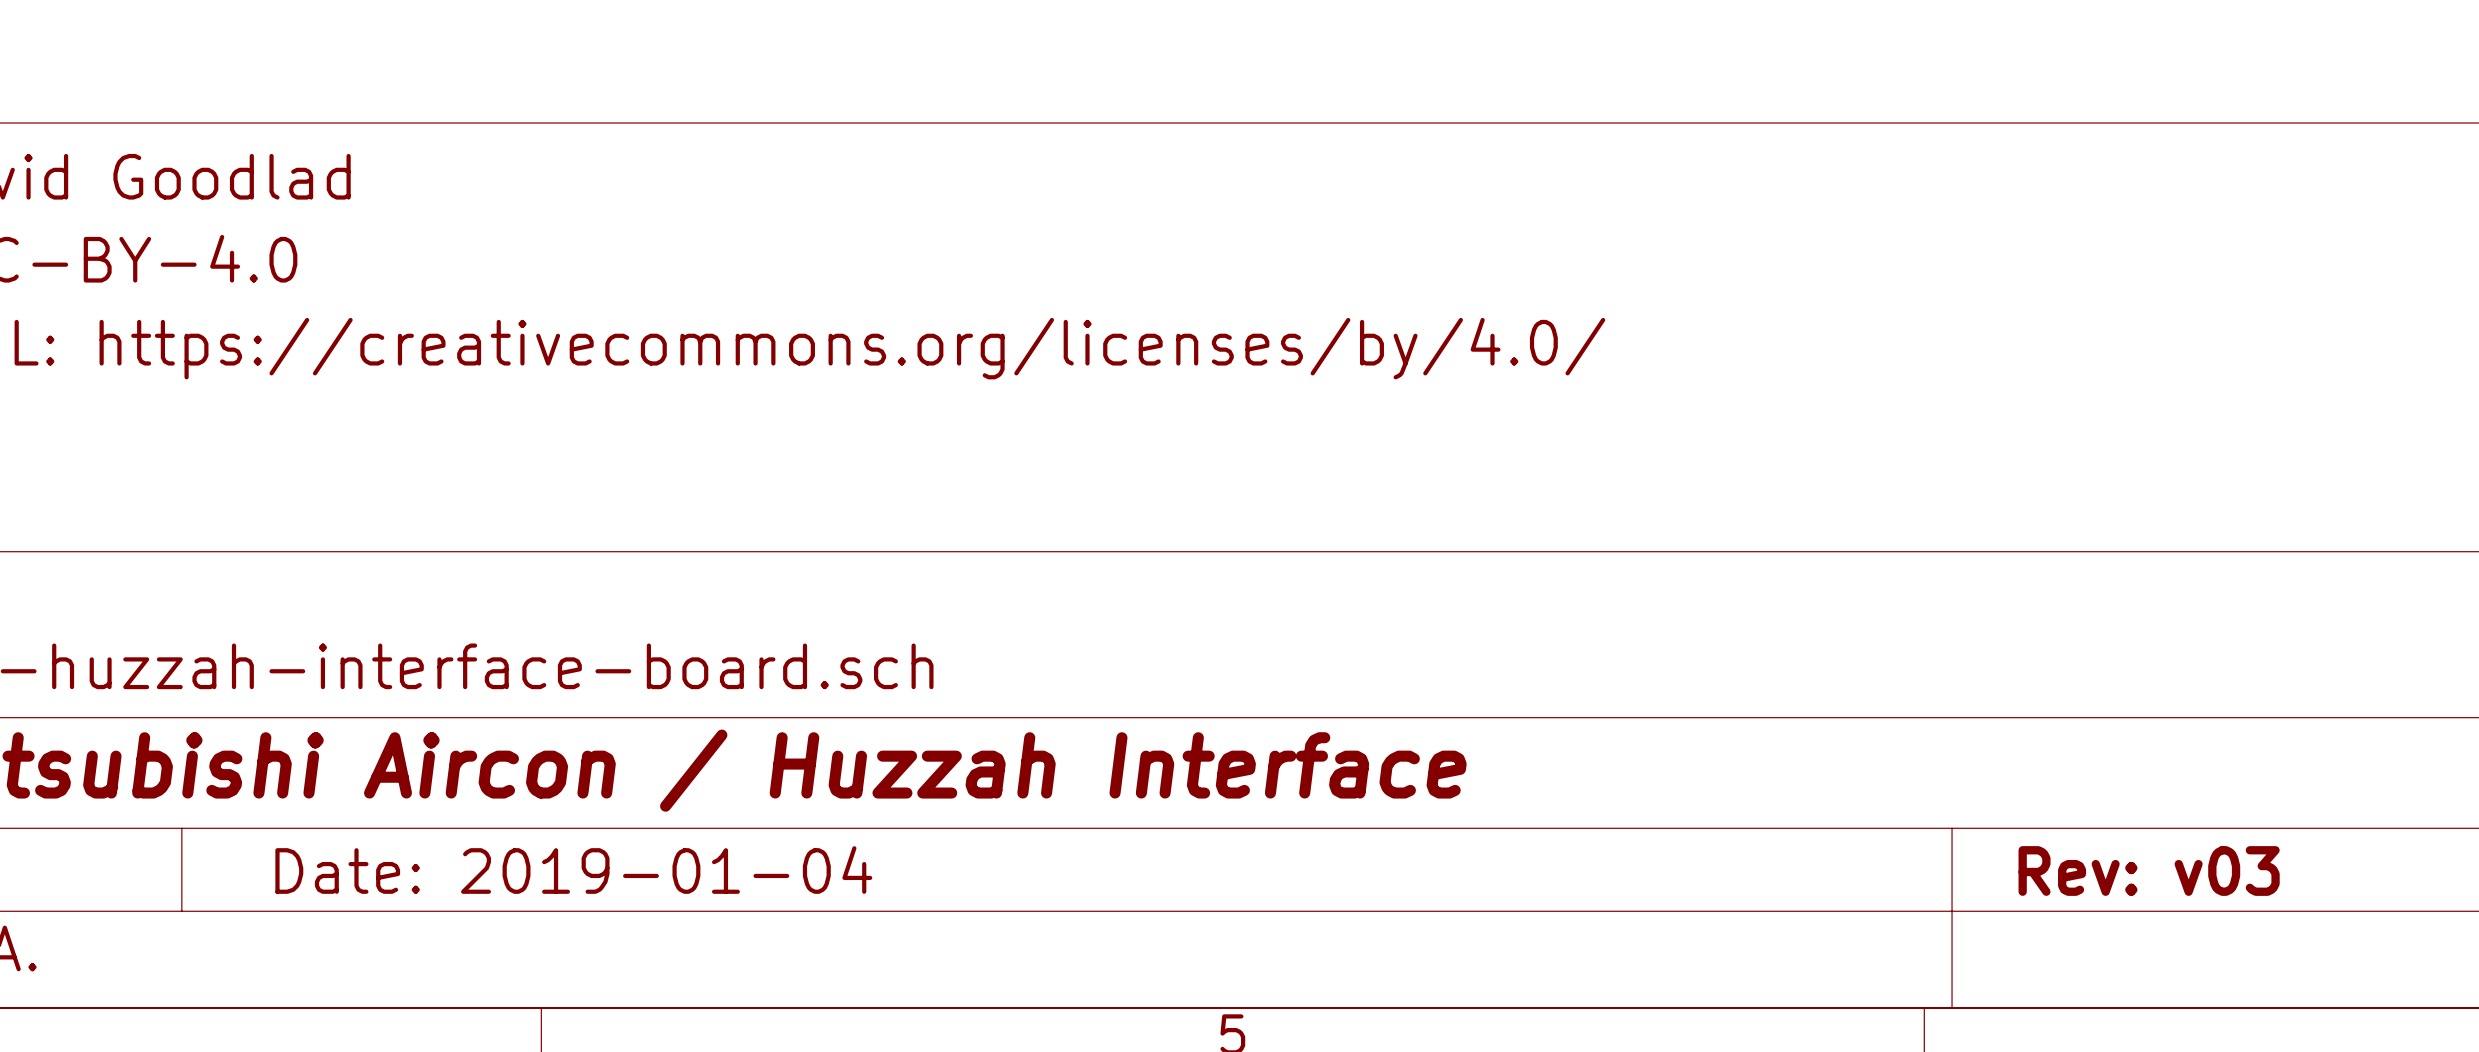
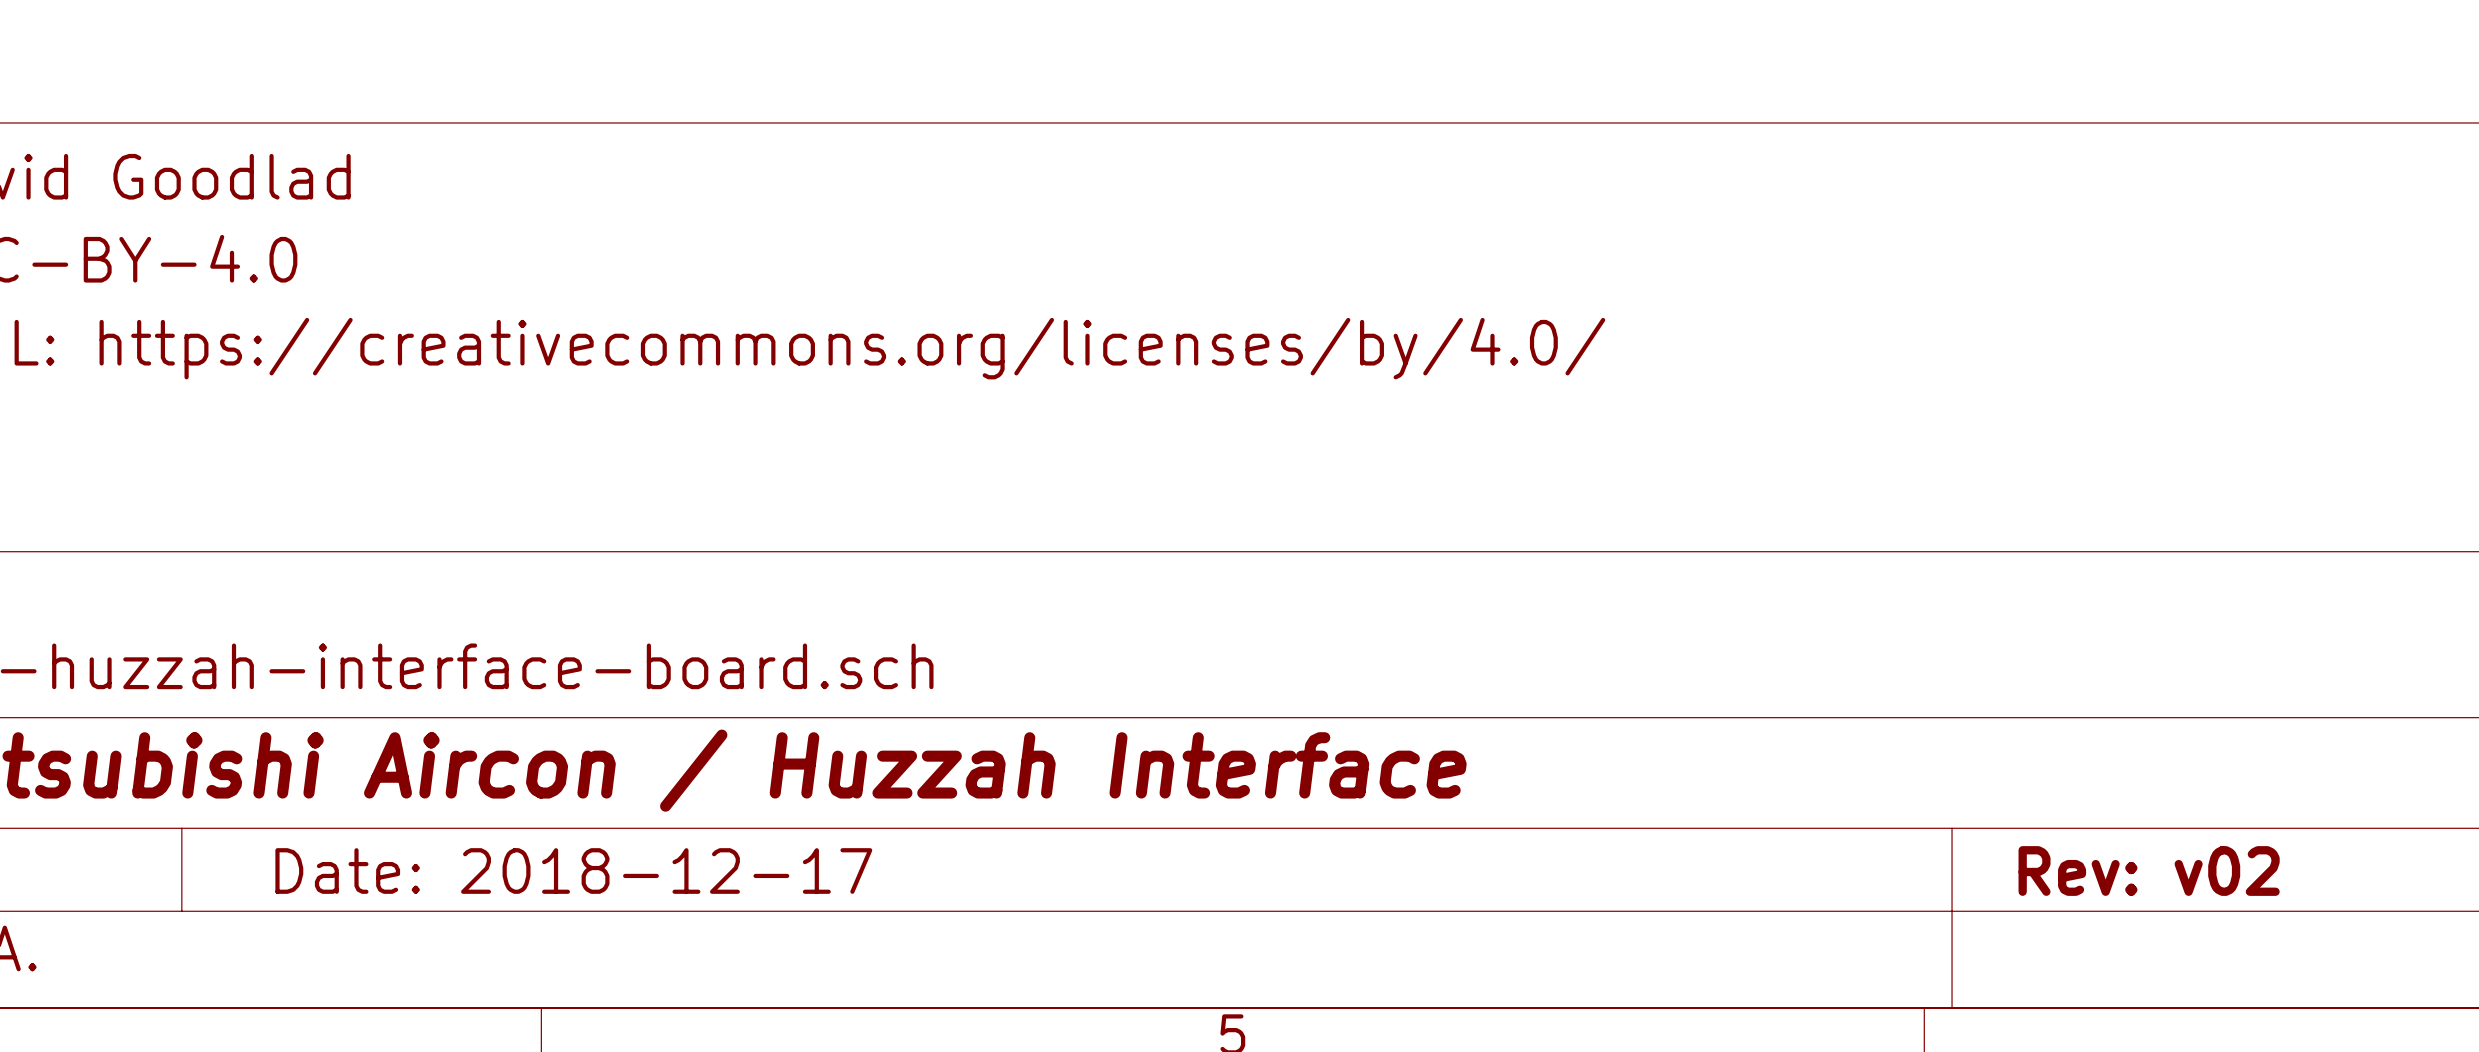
title block: Date: 2019-01-04 (573, 870) -> Date: 2018-12-17 (573, 871)
title block: Rev: v03 (2149, 871) -> Rev: v02 (2149, 871)

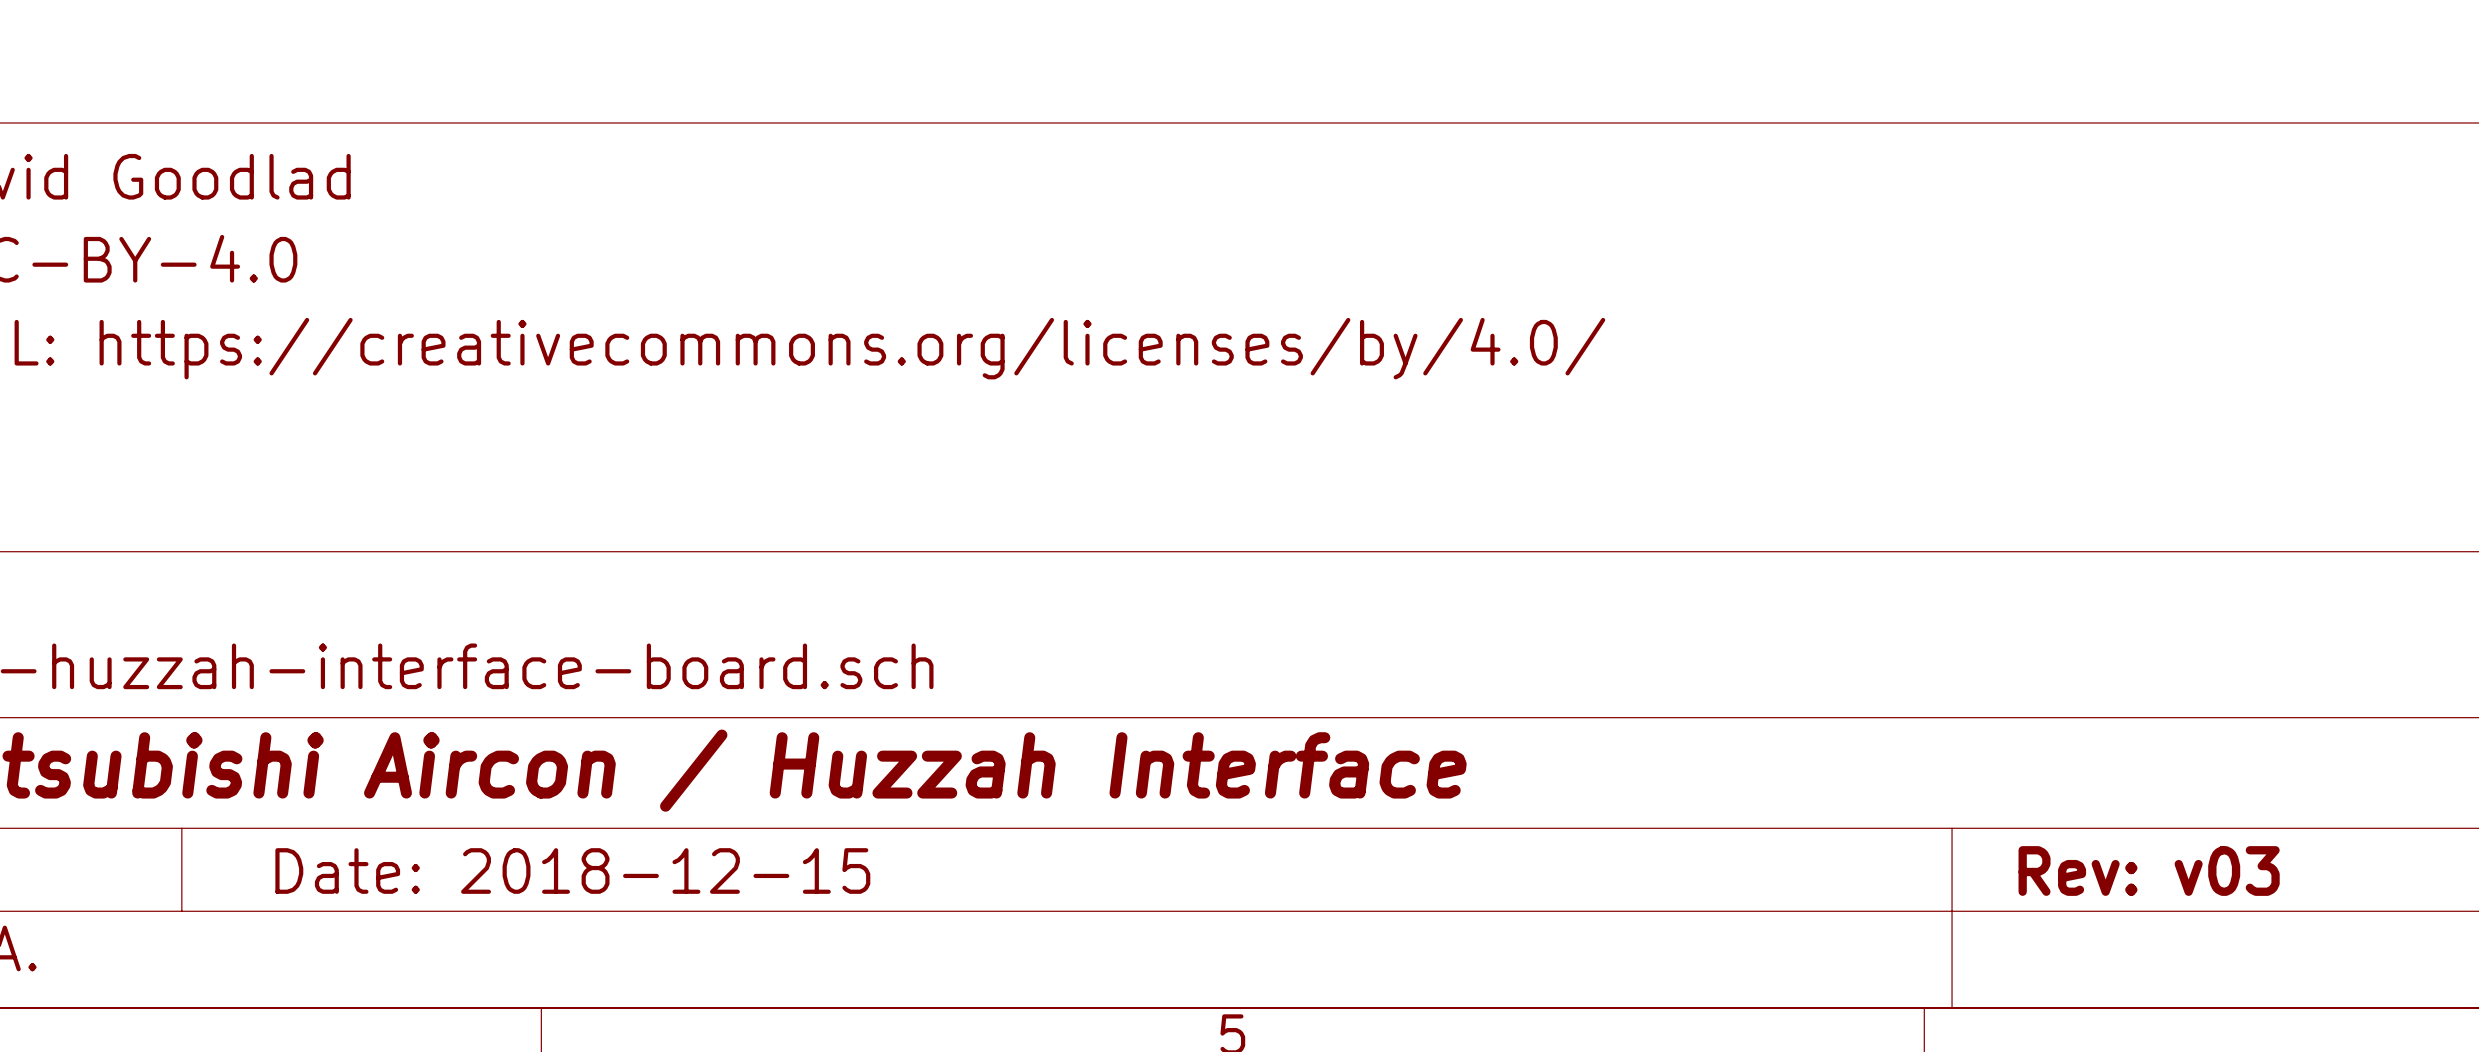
title block: Date: 2018-12-17 (573, 871) -> Date: 2018-12-15 (572, 871)
title block: Rev: v02 (2149, 871) -> Rev: v03 (2149, 871)

